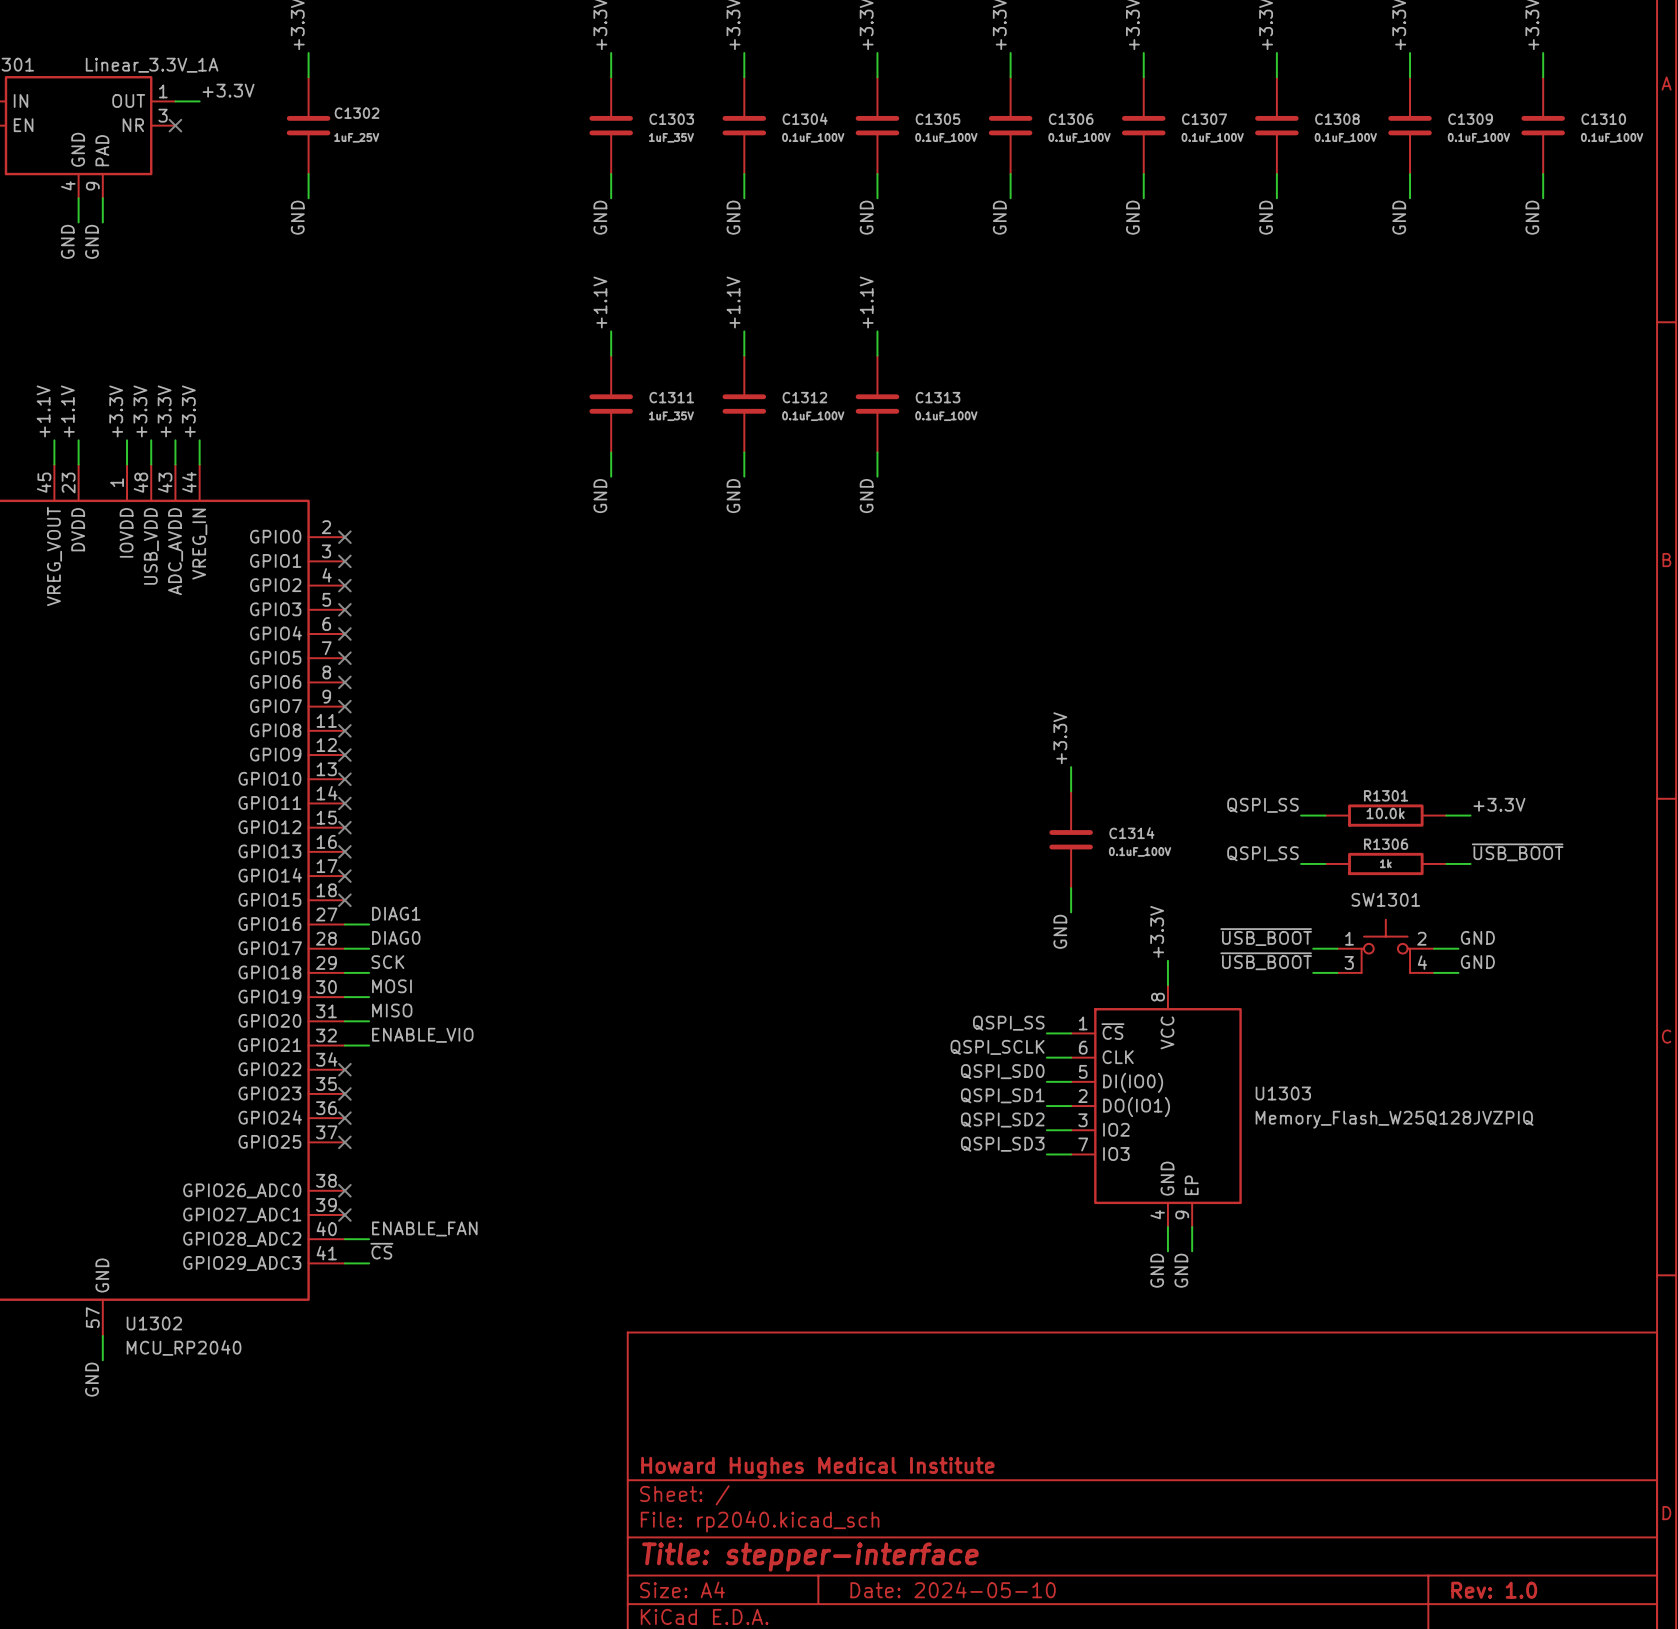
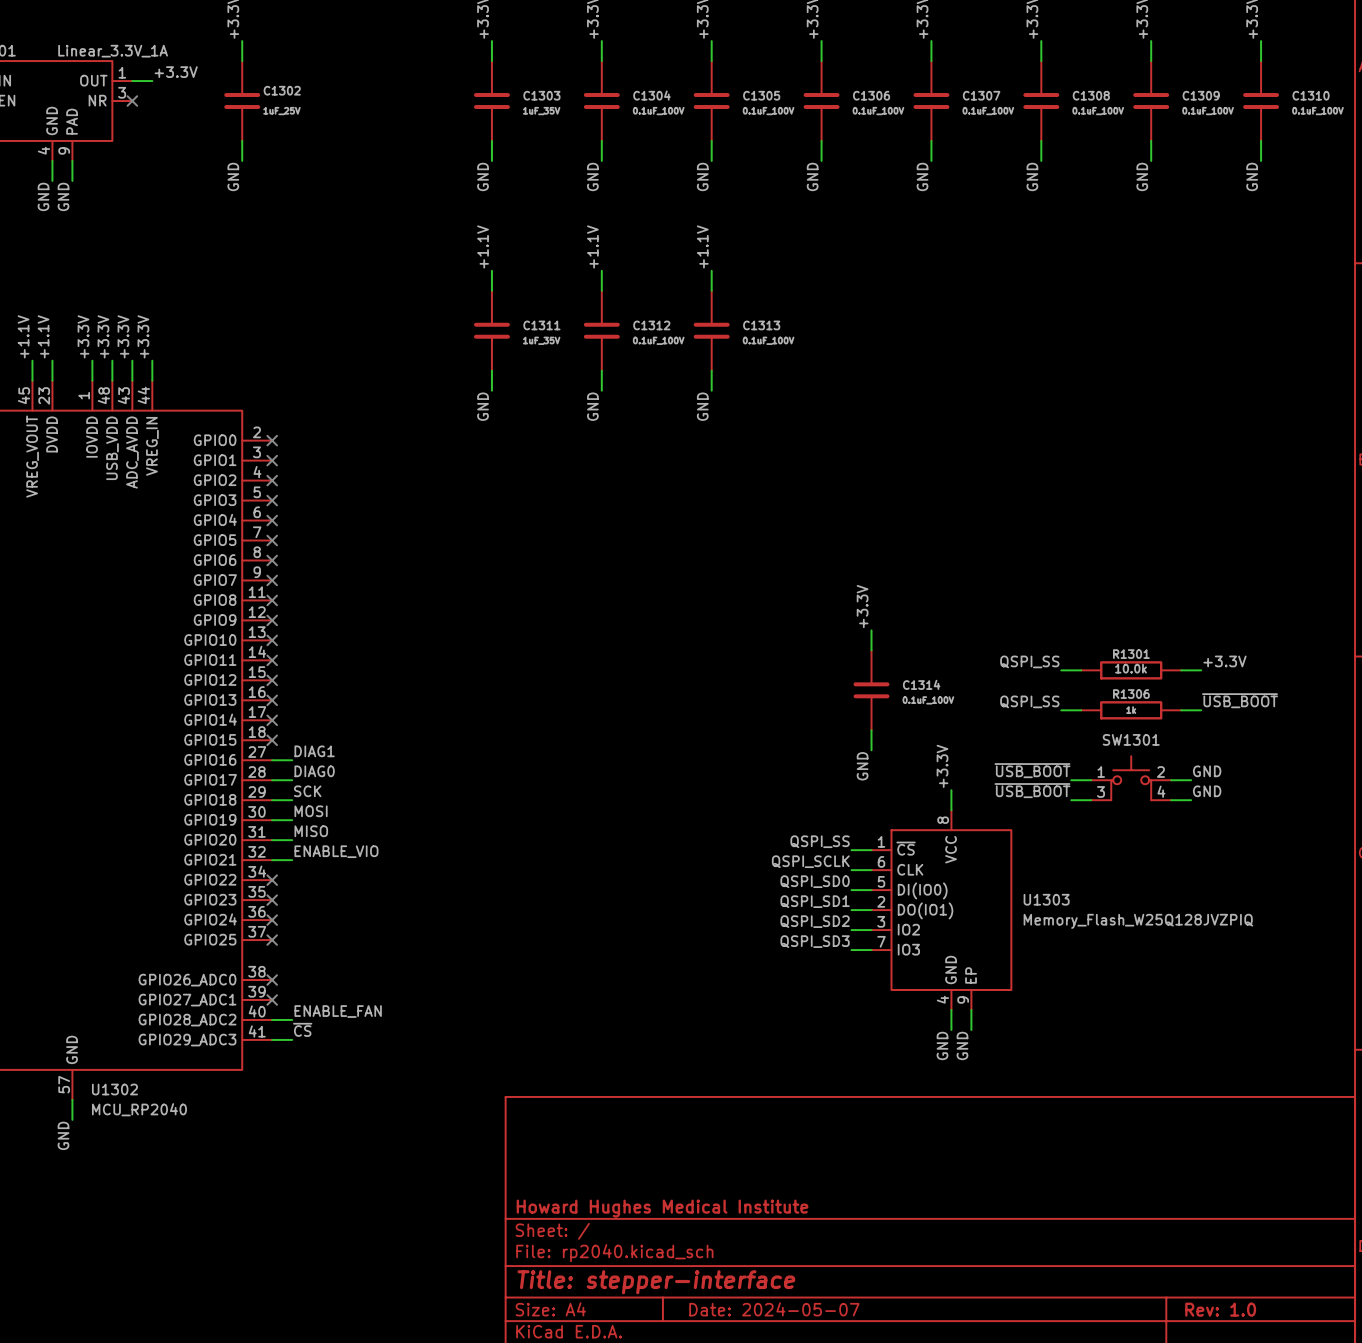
title block: Date: 2024-05-10 (953, 1589) -> Date: 2024-05-07 (774, 1309)

